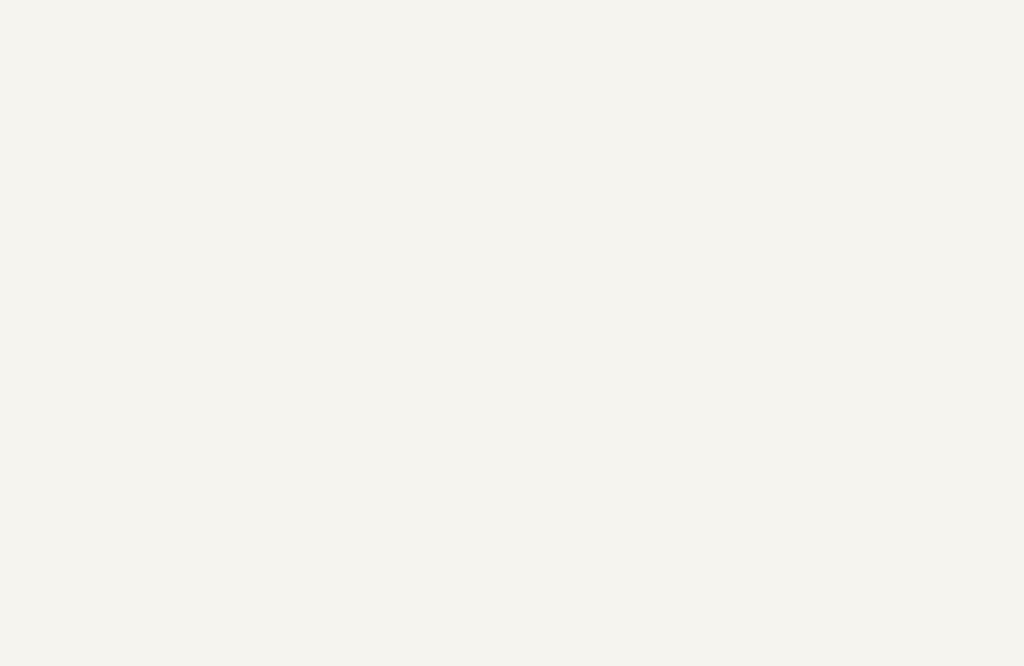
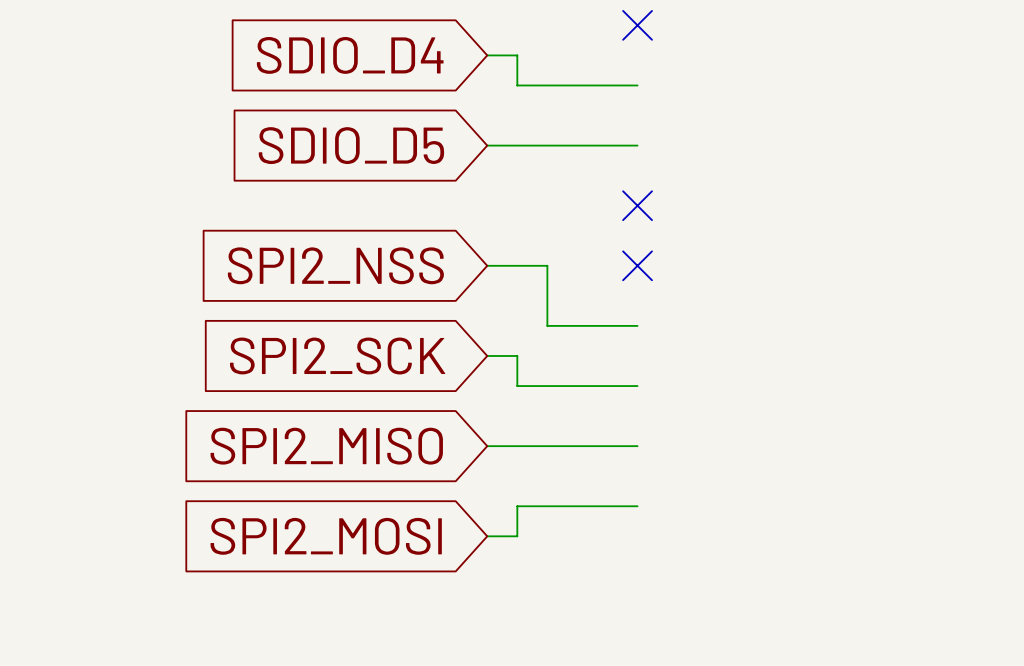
no-connect mark: none -> (637, 25)
wire: none -> (487, 55) (517, 55) (517, 85) (637, 85)
global label: none -> SDIO_D4 (350, 55)
wire: none -> (487, 145) (637, 145)
global label: none -> SDIO_D5 (351, 145)
no-connect mark: none -> (637, 205)
wire: none -> (487, 265) (547, 265) (547, 325) (637, 325)
no-connect mark: none -> (637, 265)
global label: none -> SPI2_NSS (335, 265)
wire: none -> (487, 355) (517, 355) (517, 386) (637, 386)
global label: none -> SPI2_SCK (337, 356)
wire: none -> (487, 446) (637, 446)
global label: none -> SPI2_MISO (326, 446)
wire: none -> (637, 506) (517, 506) (517, 536) (487, 536)
global label: none -> SPI2_MOSI (326, 536)

